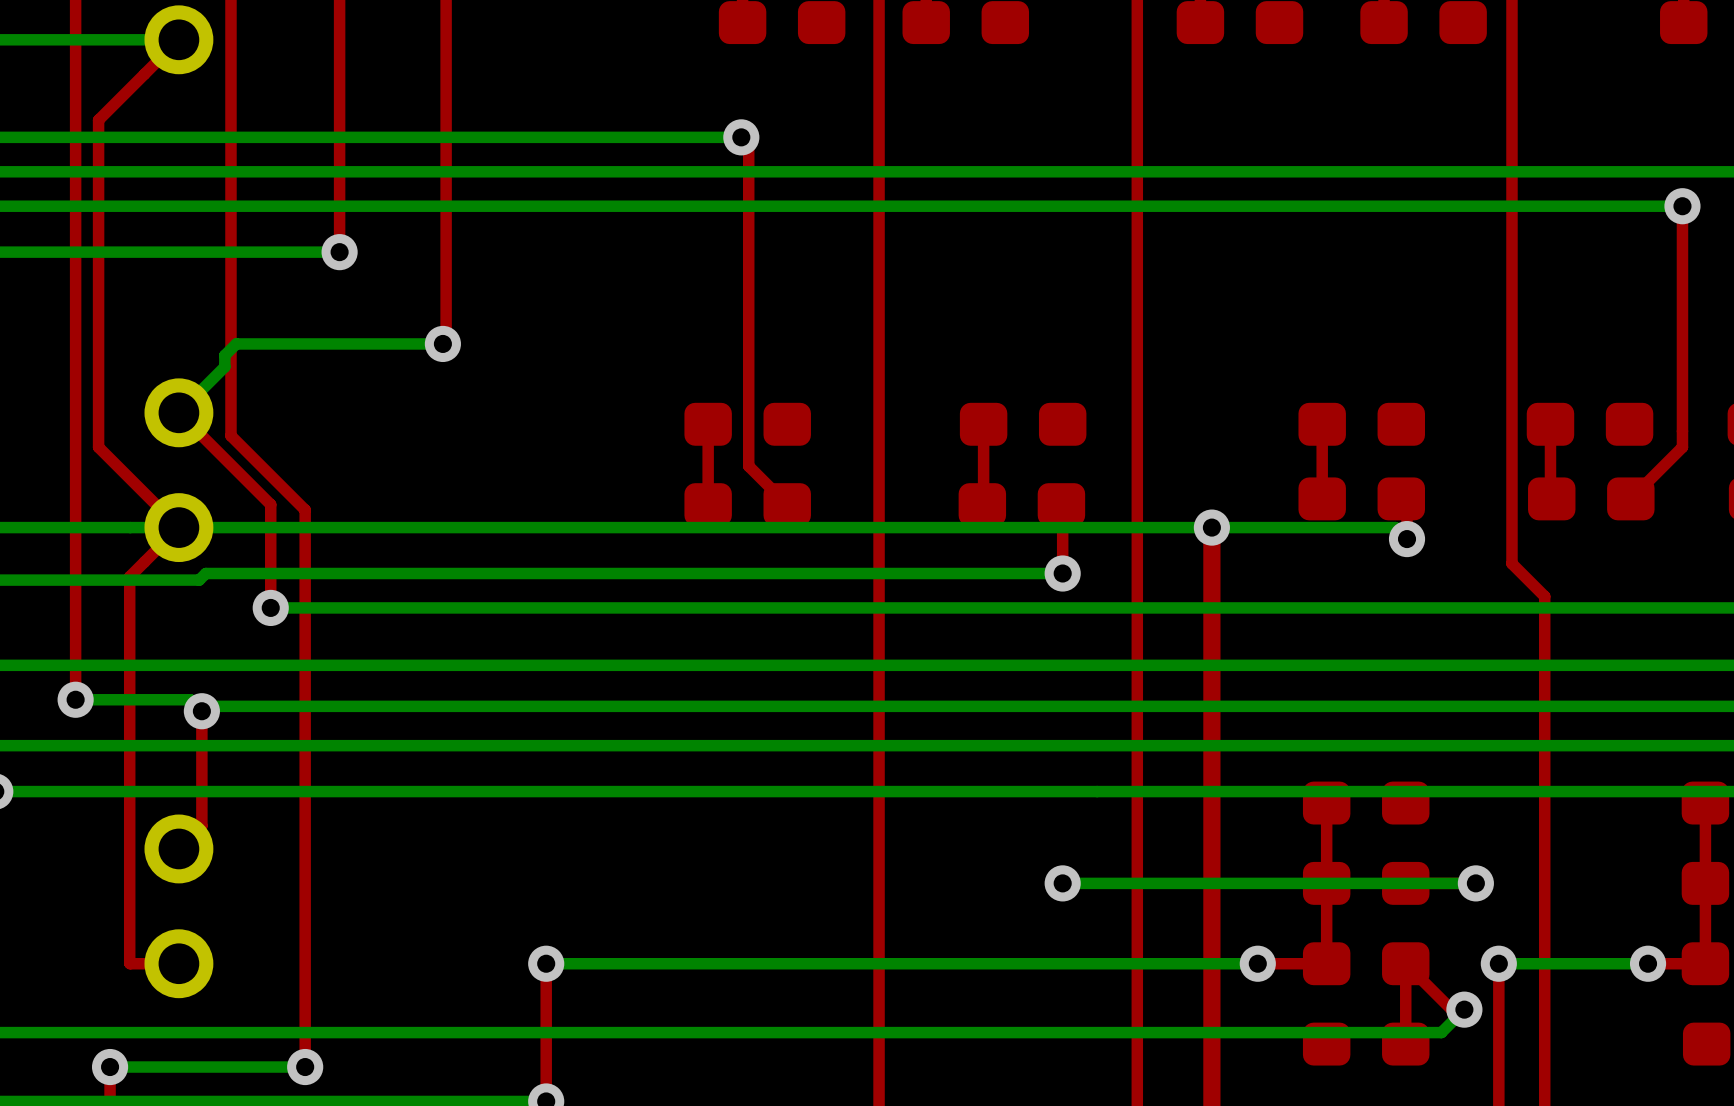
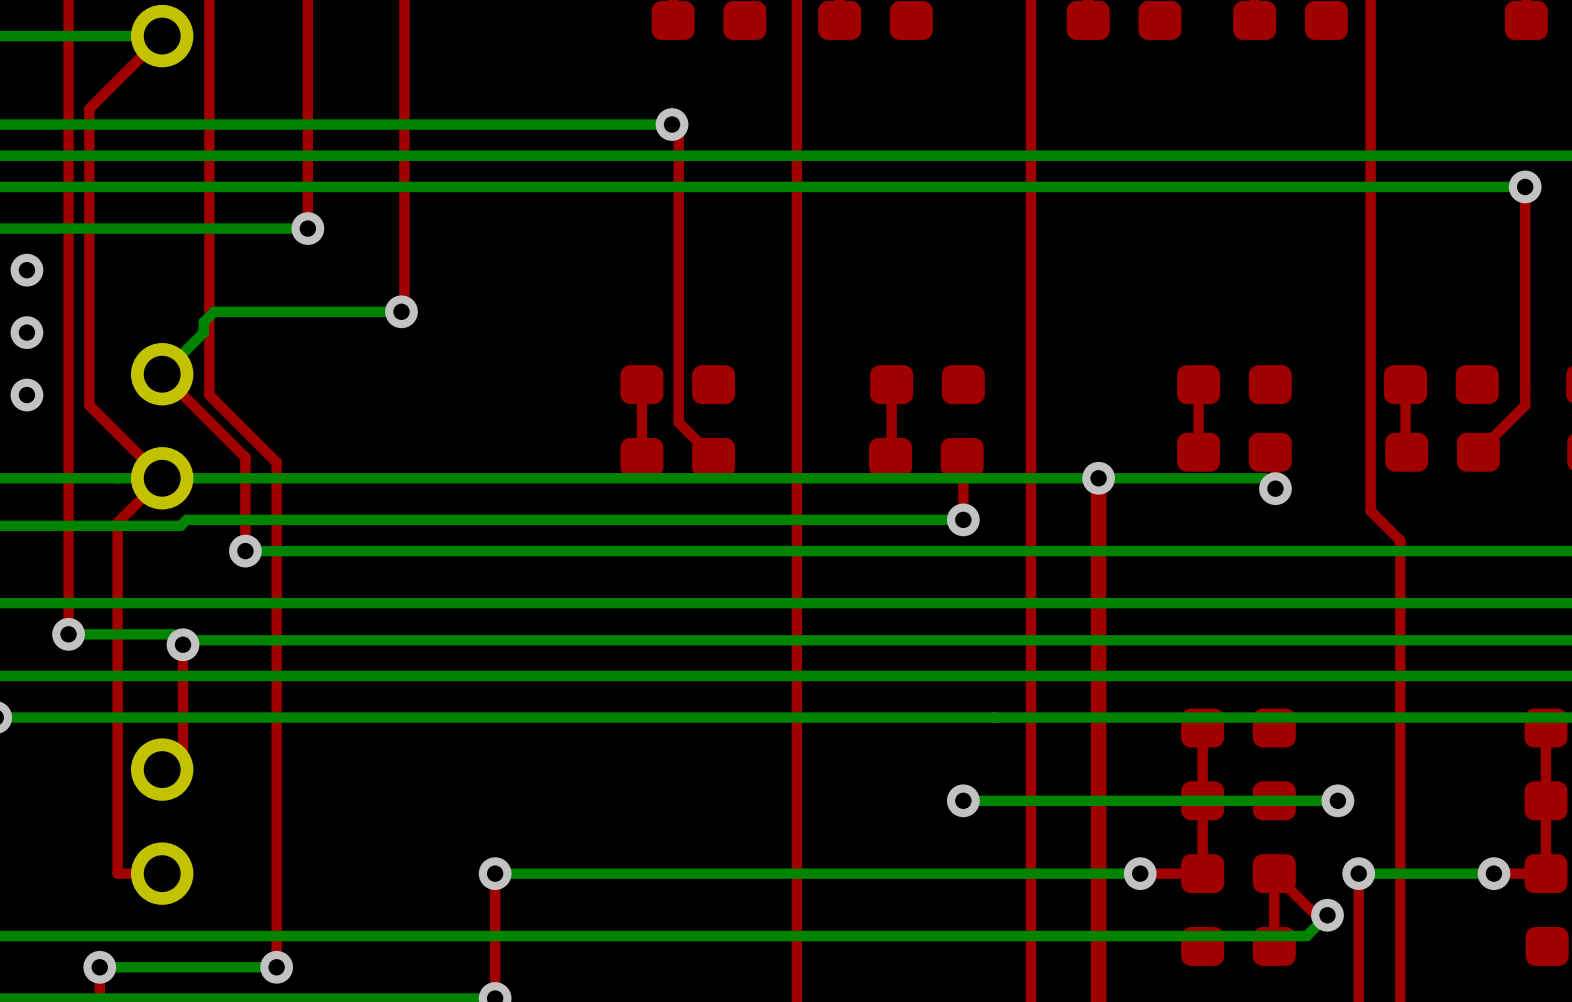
via: none -> (26, 270)
via: none -> (26, 332)
via: none -> (26, 395)

